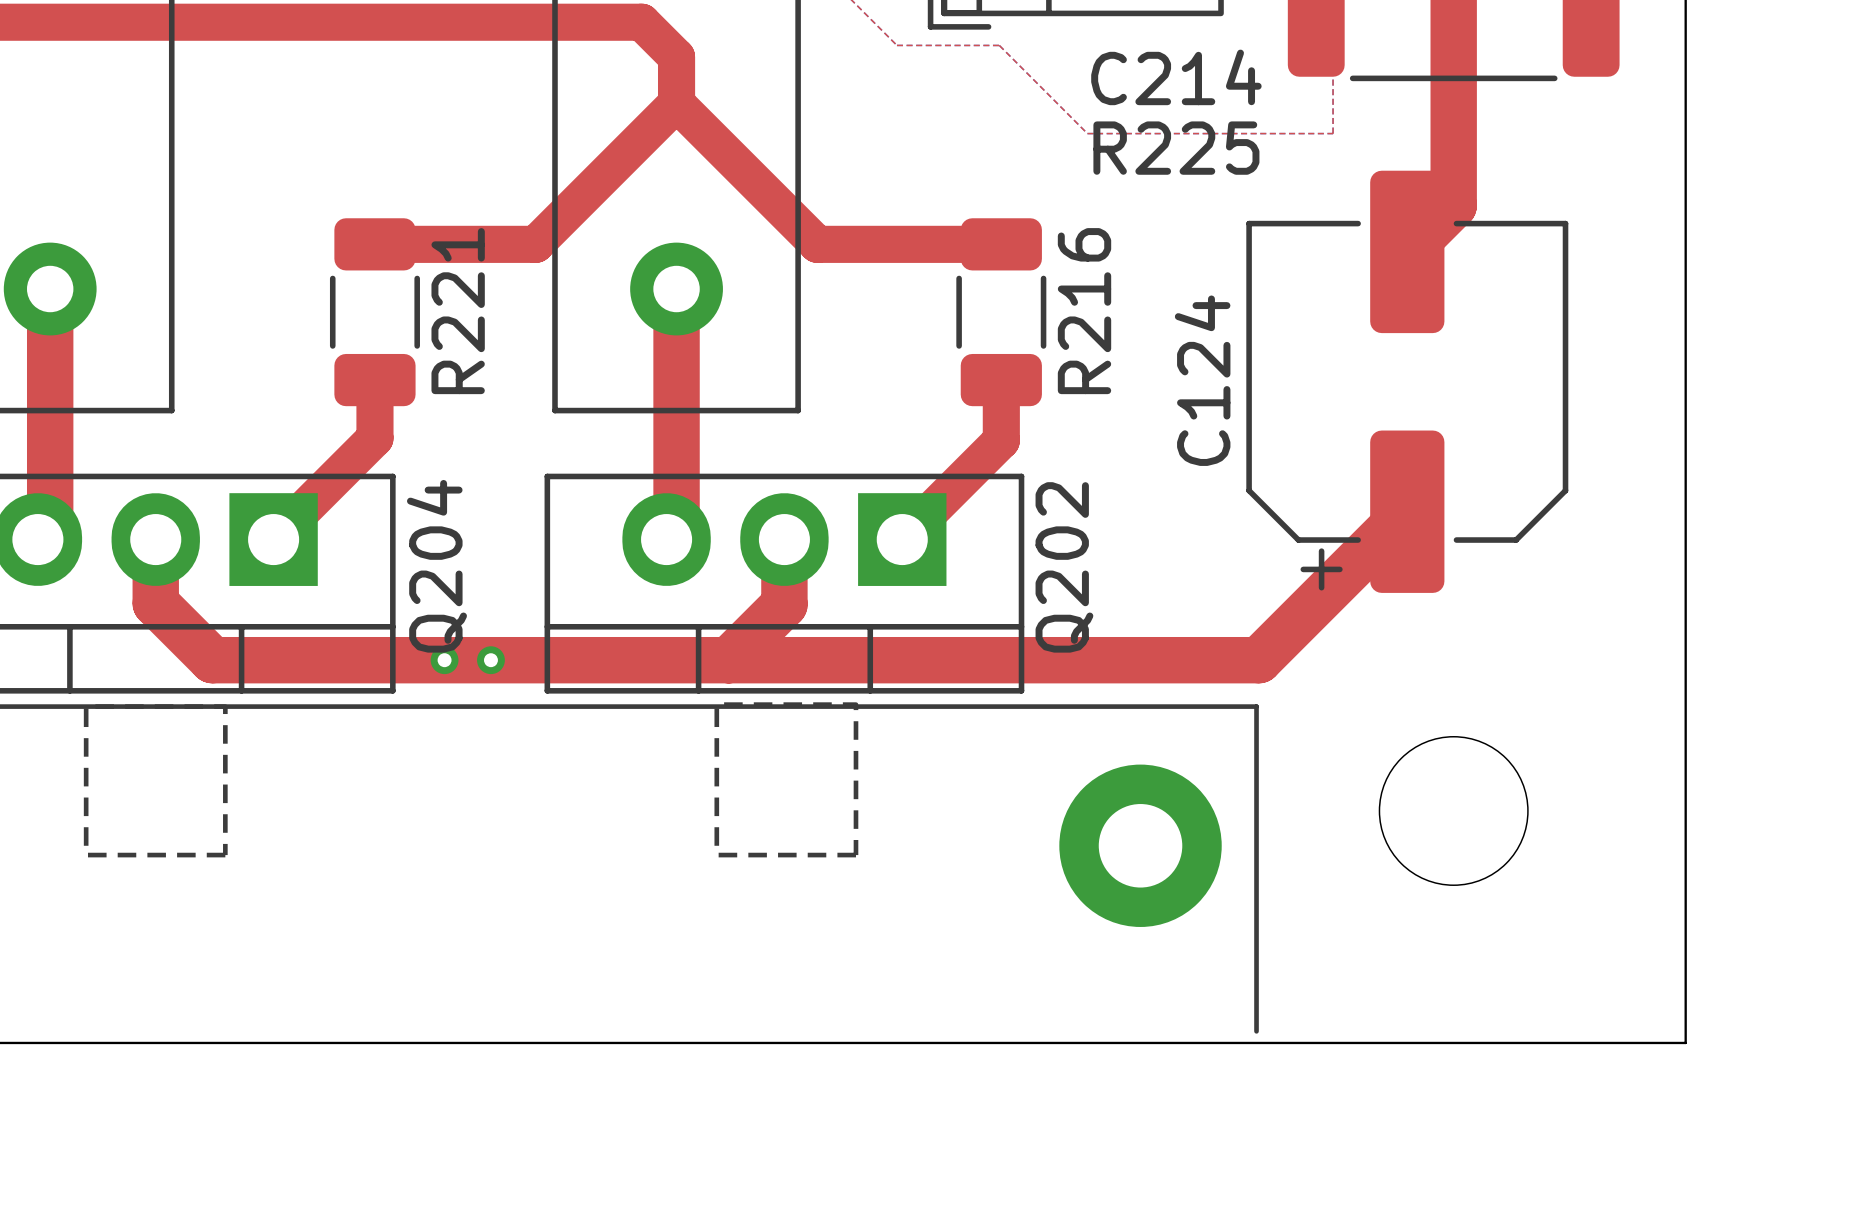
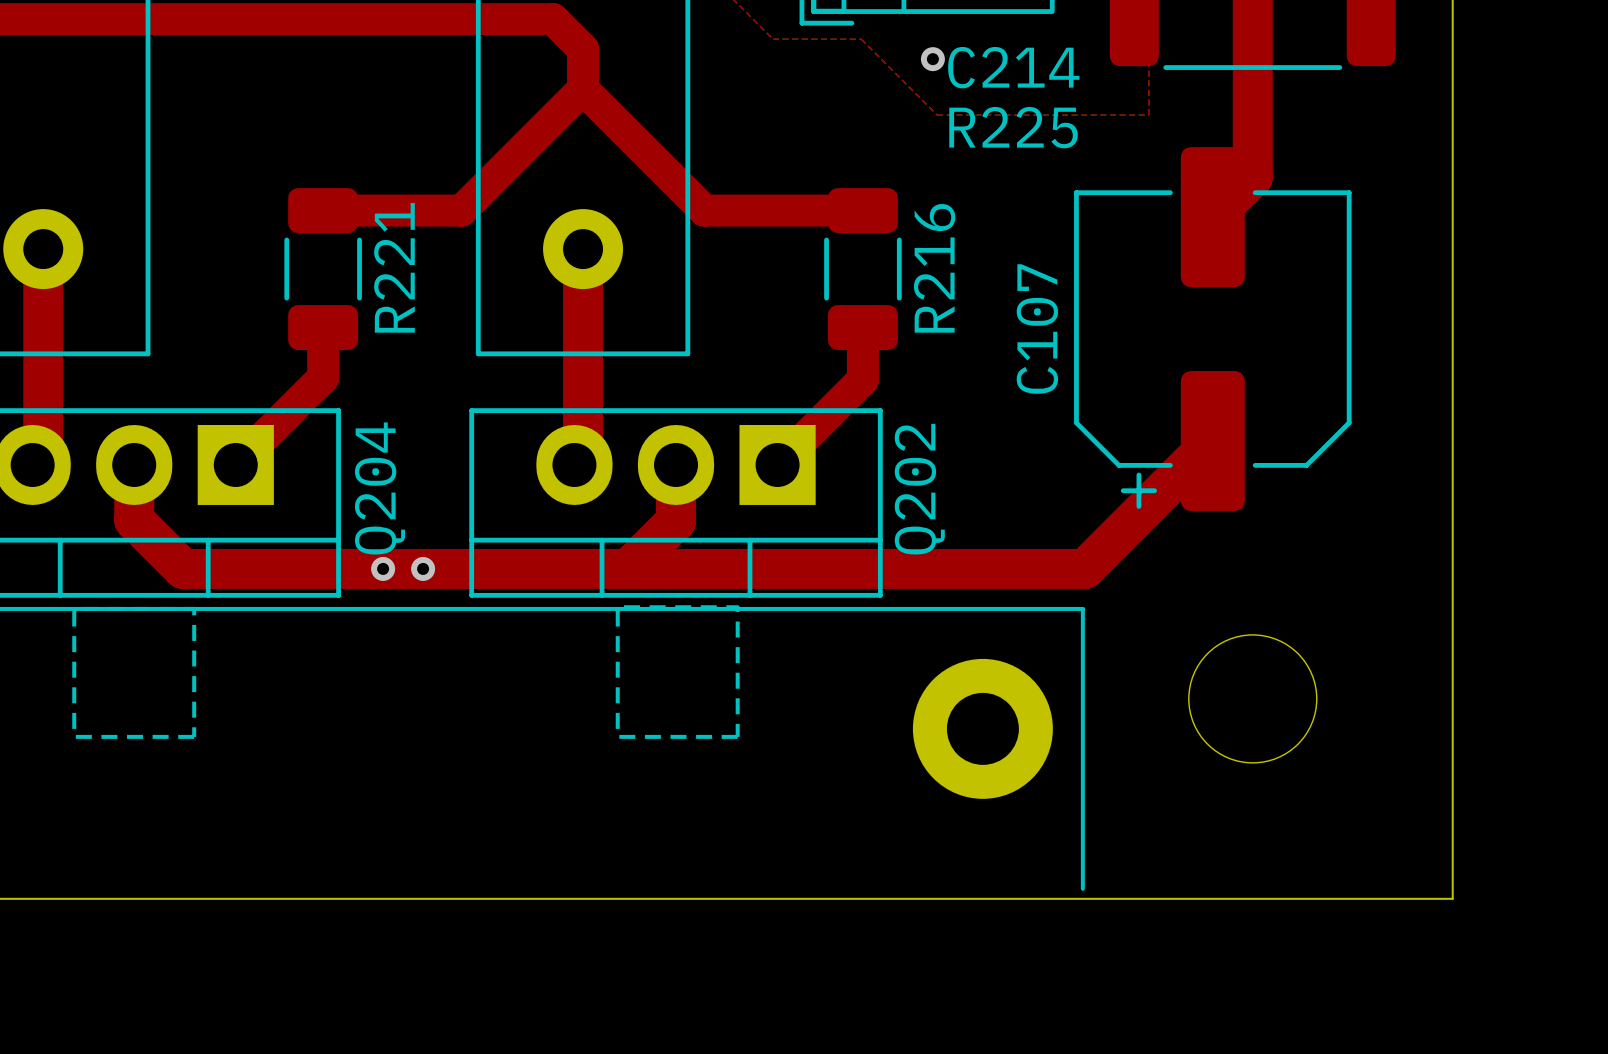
via: none -> (932, 59)
C124 name: C124 (1202, 380) -> C107 (1037, 329)

